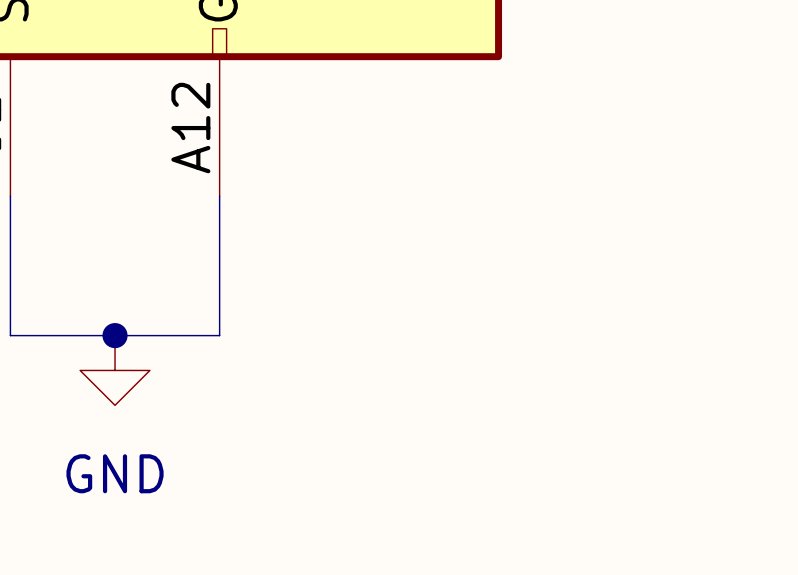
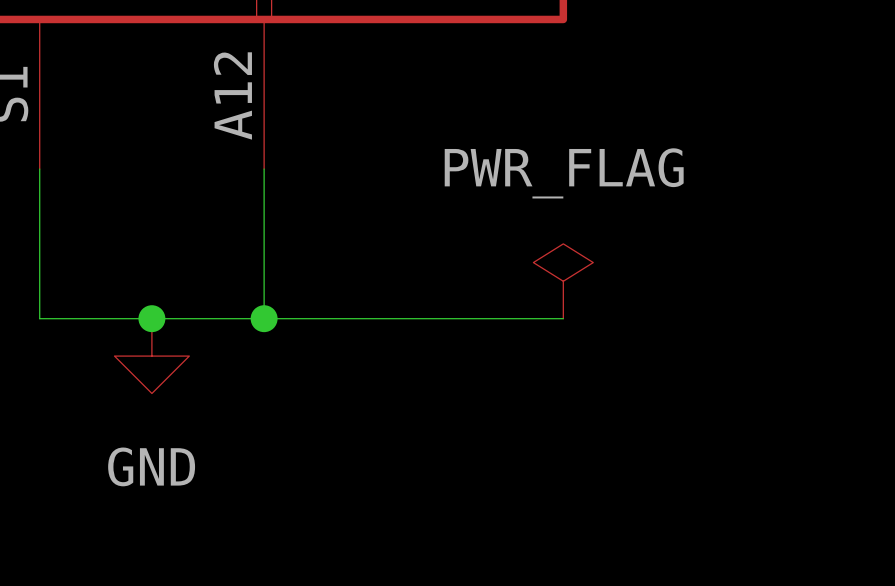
power symbol: none -> PWR_FLAG (563, 281)
wire: none -> (264, 318) (563, 318)
junction: none -> (264, 318)

